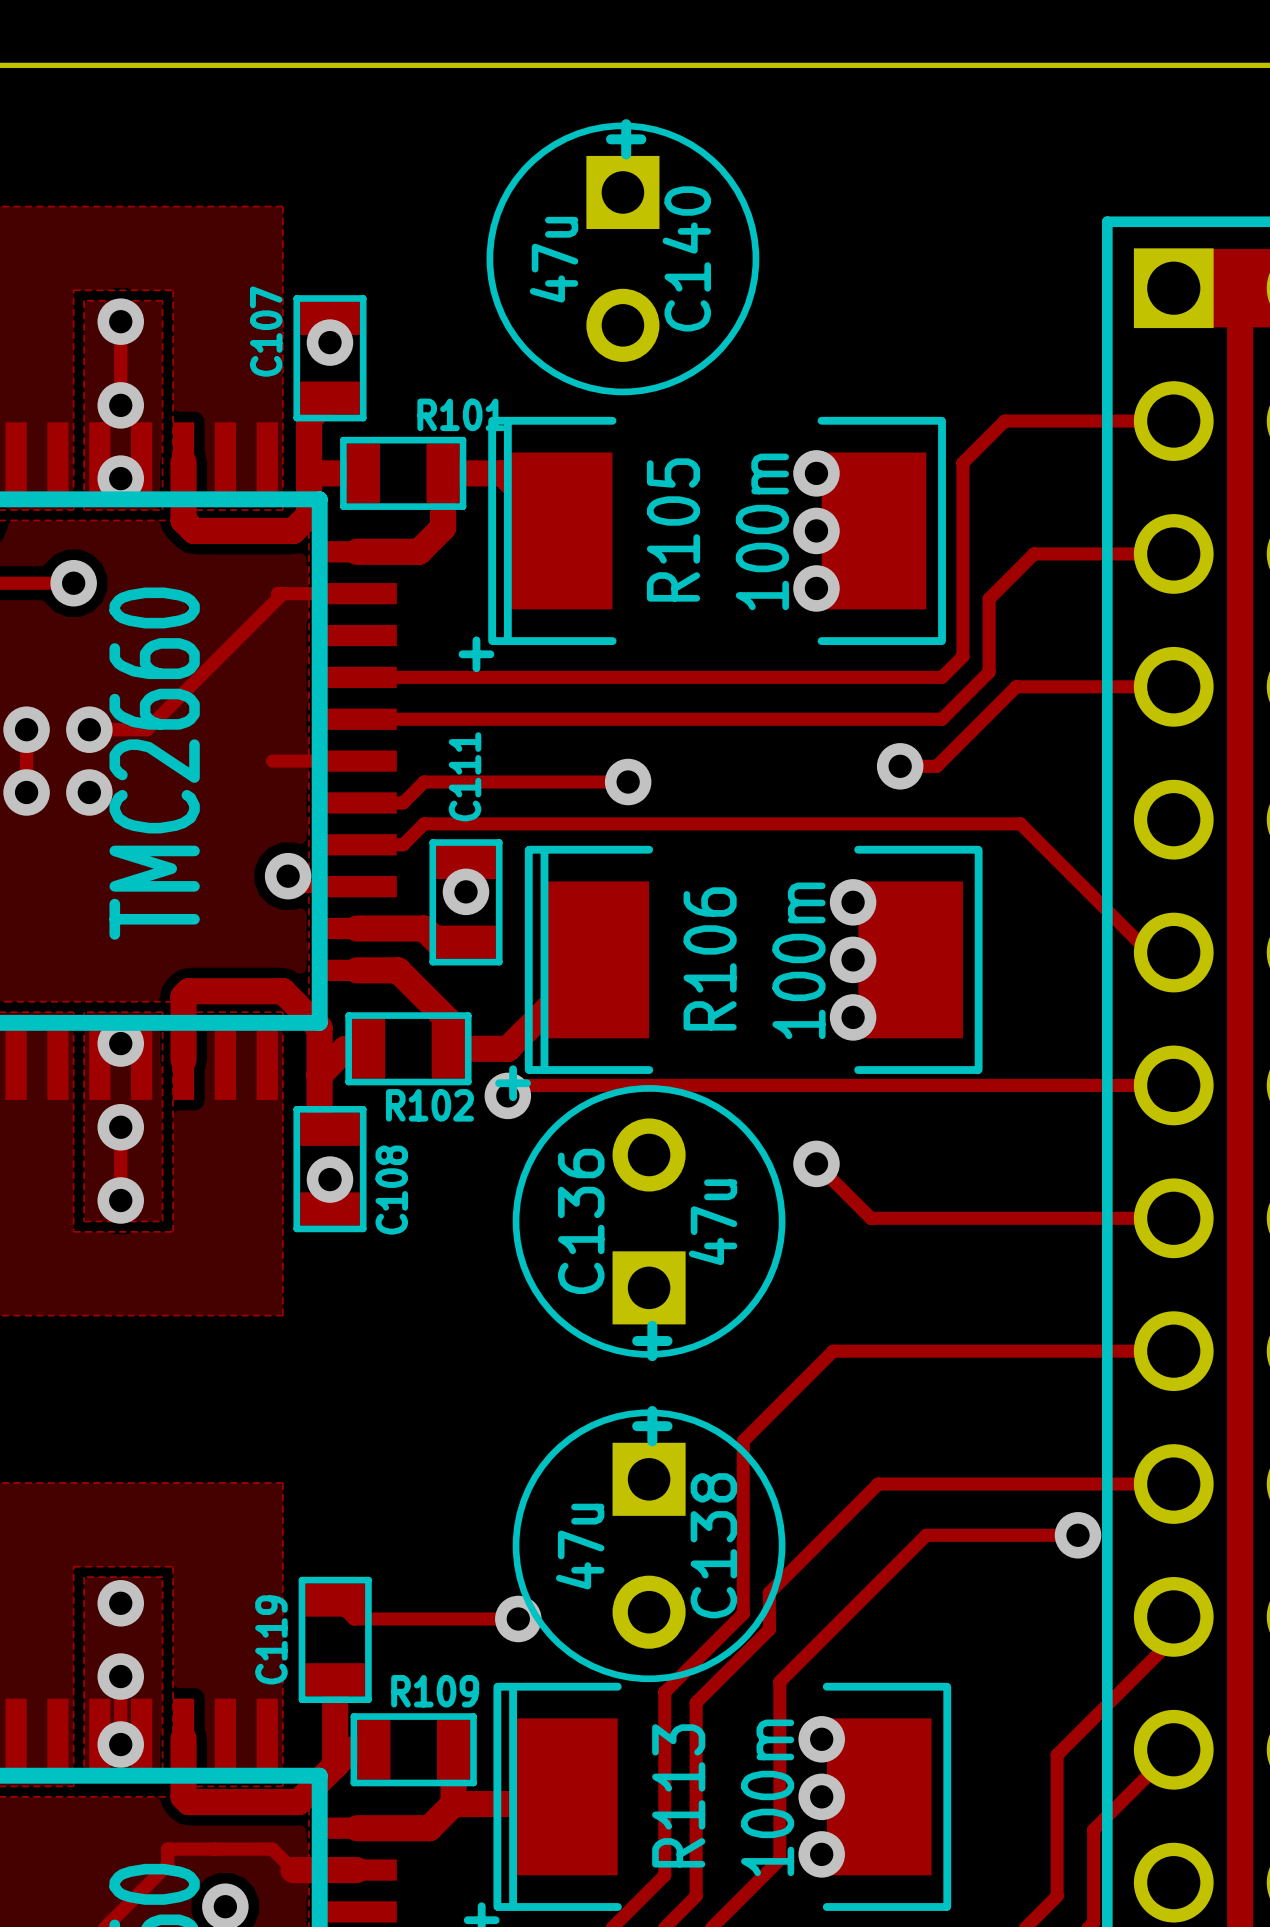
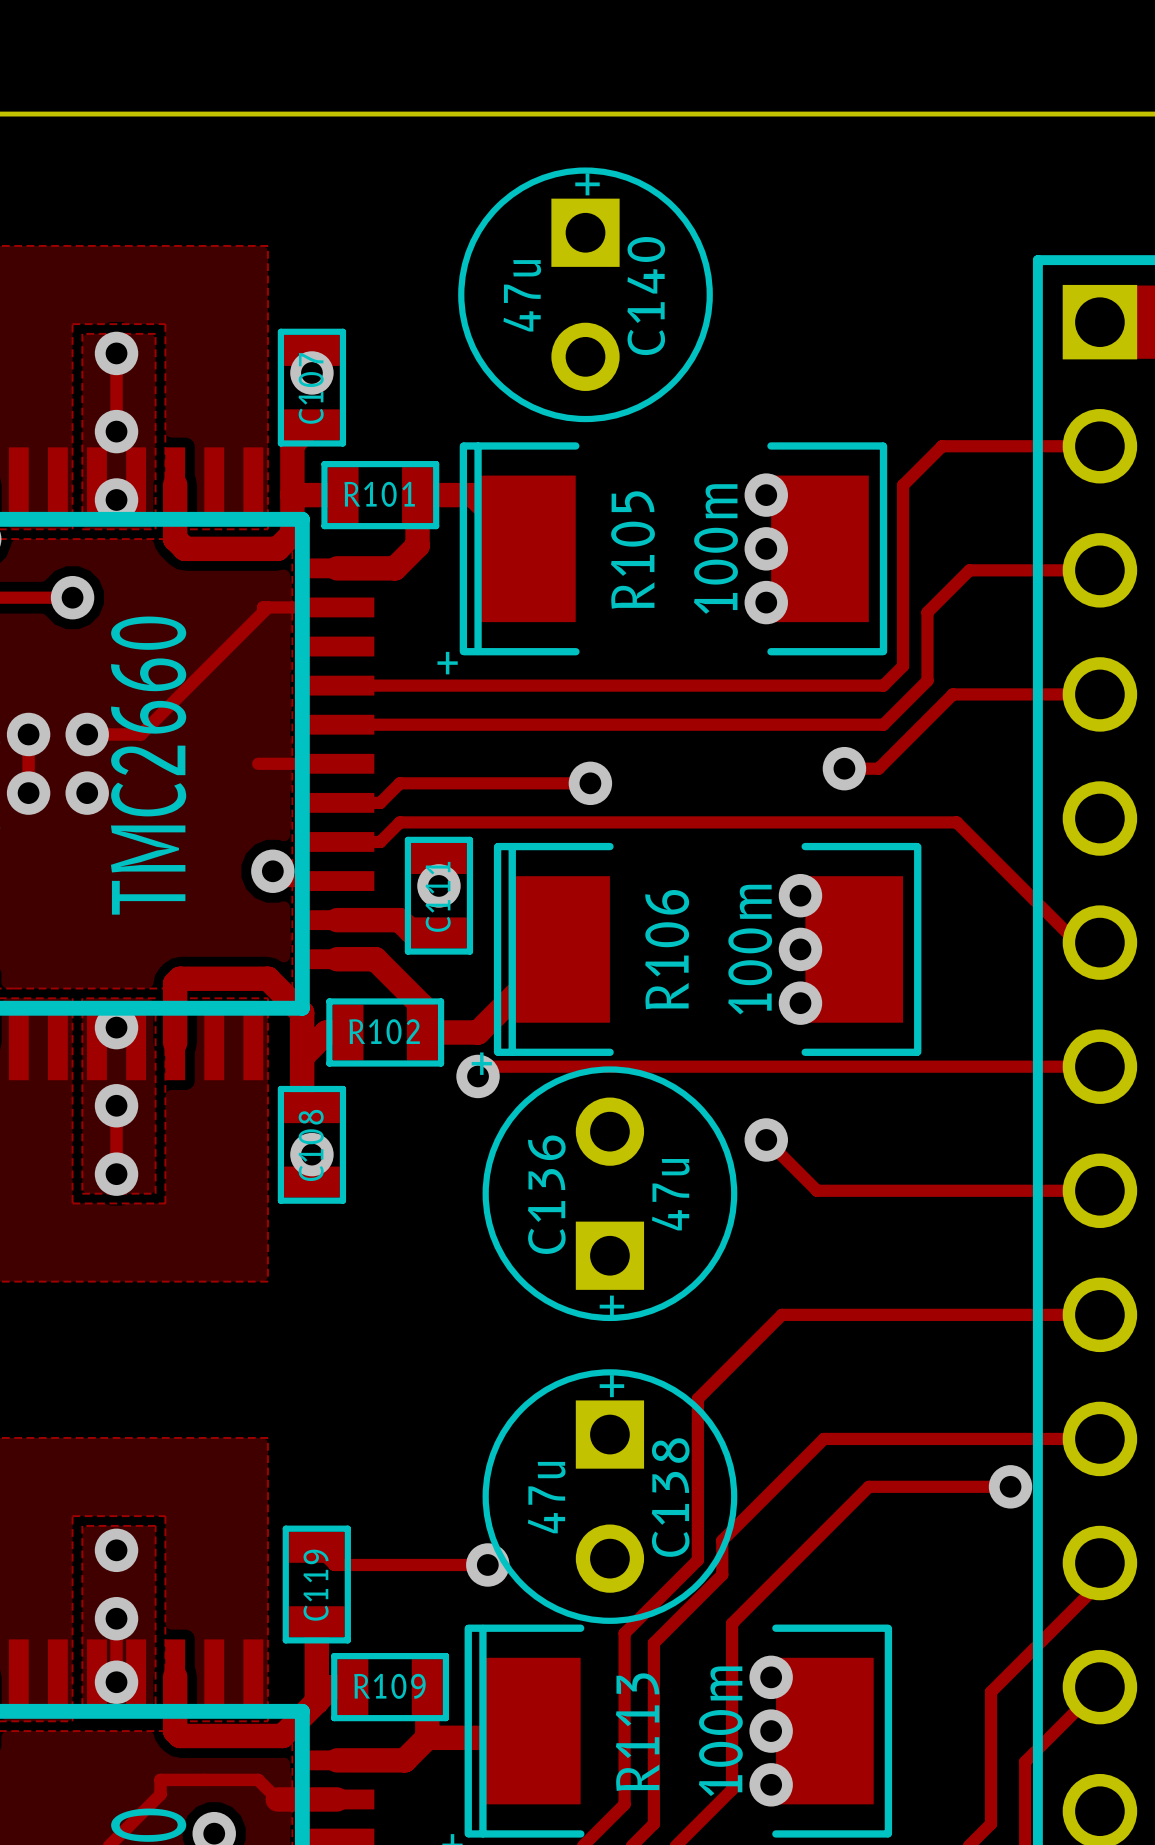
C107 name position: C107 (266, 331) -> C107 (311, 388)
R101 name position: R101 (461, 414) -> R101 (379, 494)
C111 name position: C111 (465, 776) -> C111 (438, 896)
R102 name position: R102 (429, 1105) -> R102 (384, 1031)
C108 name position: C108 (391, 1190) -> C108 (311, 1145)
C119 name position: C119 (271, 1639) -> C119 (316, 1585)
R109 name position: R109 (435, 1691) -> R109 (389, 1686)

